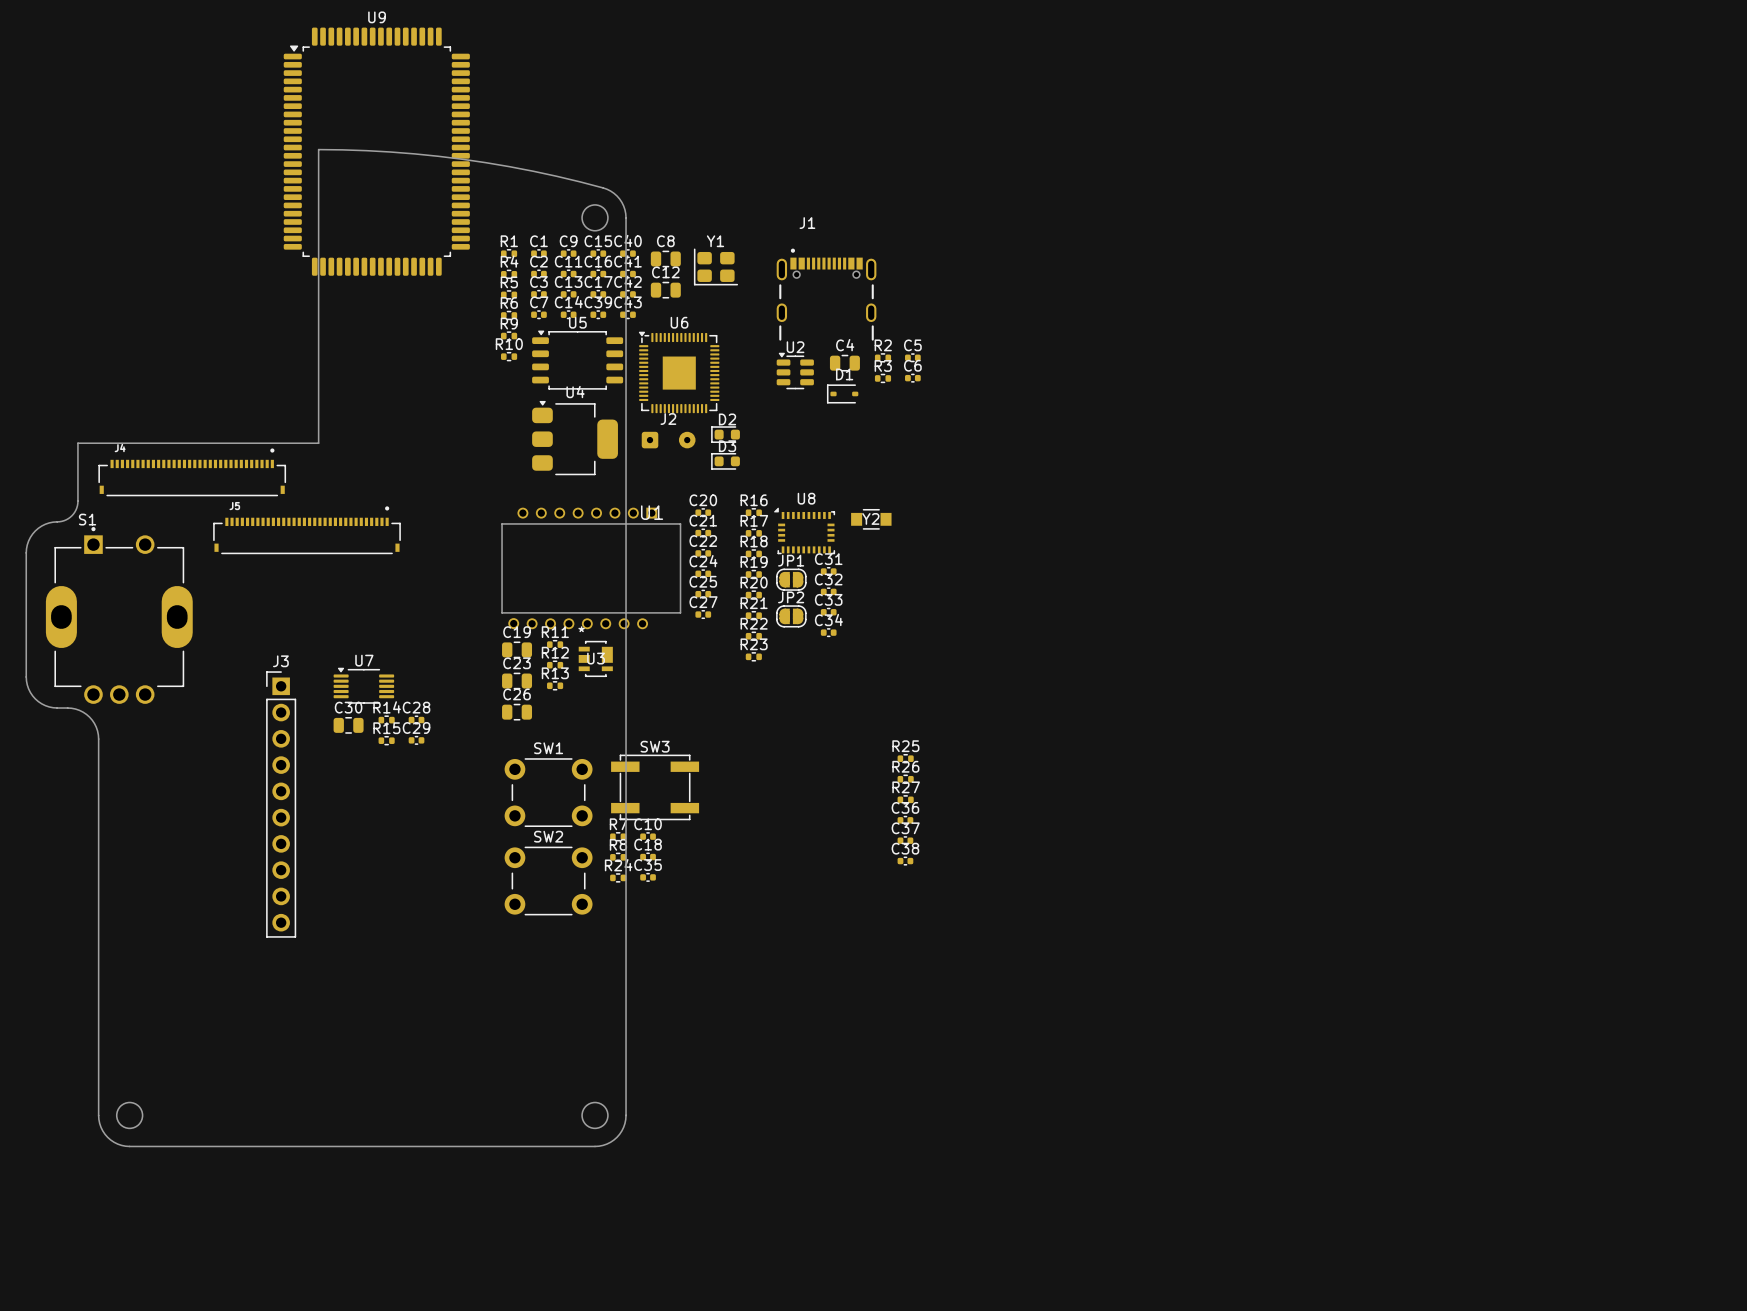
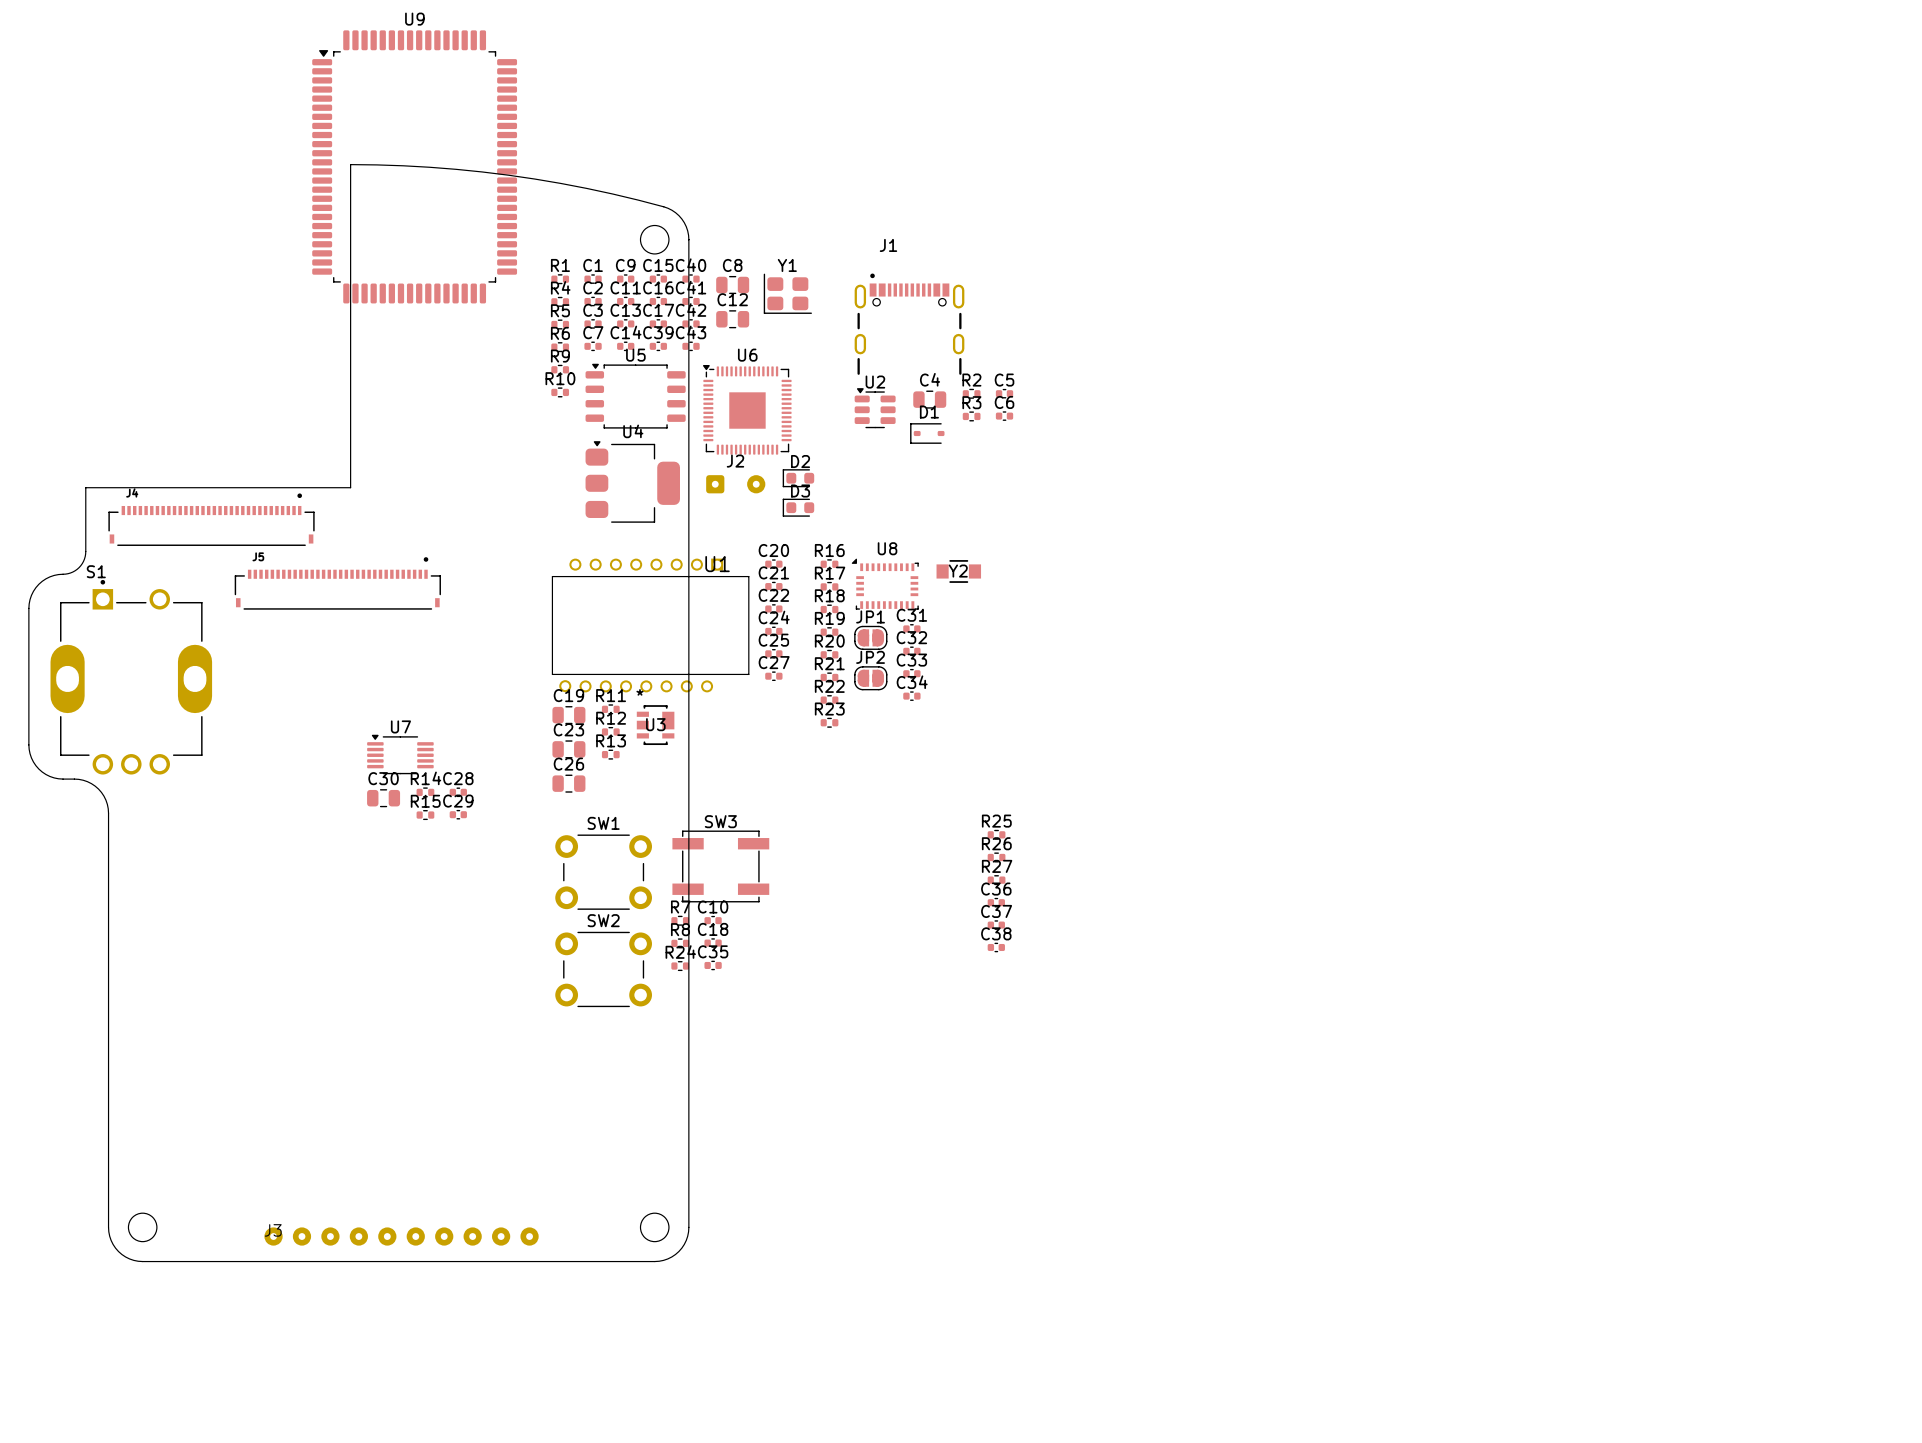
J3 name position: J3 (280, 661) -> J3 (273, 1230)
J3 footprint: [266, 671, 297, 938] -> [264, 1227, 539, 1246]

